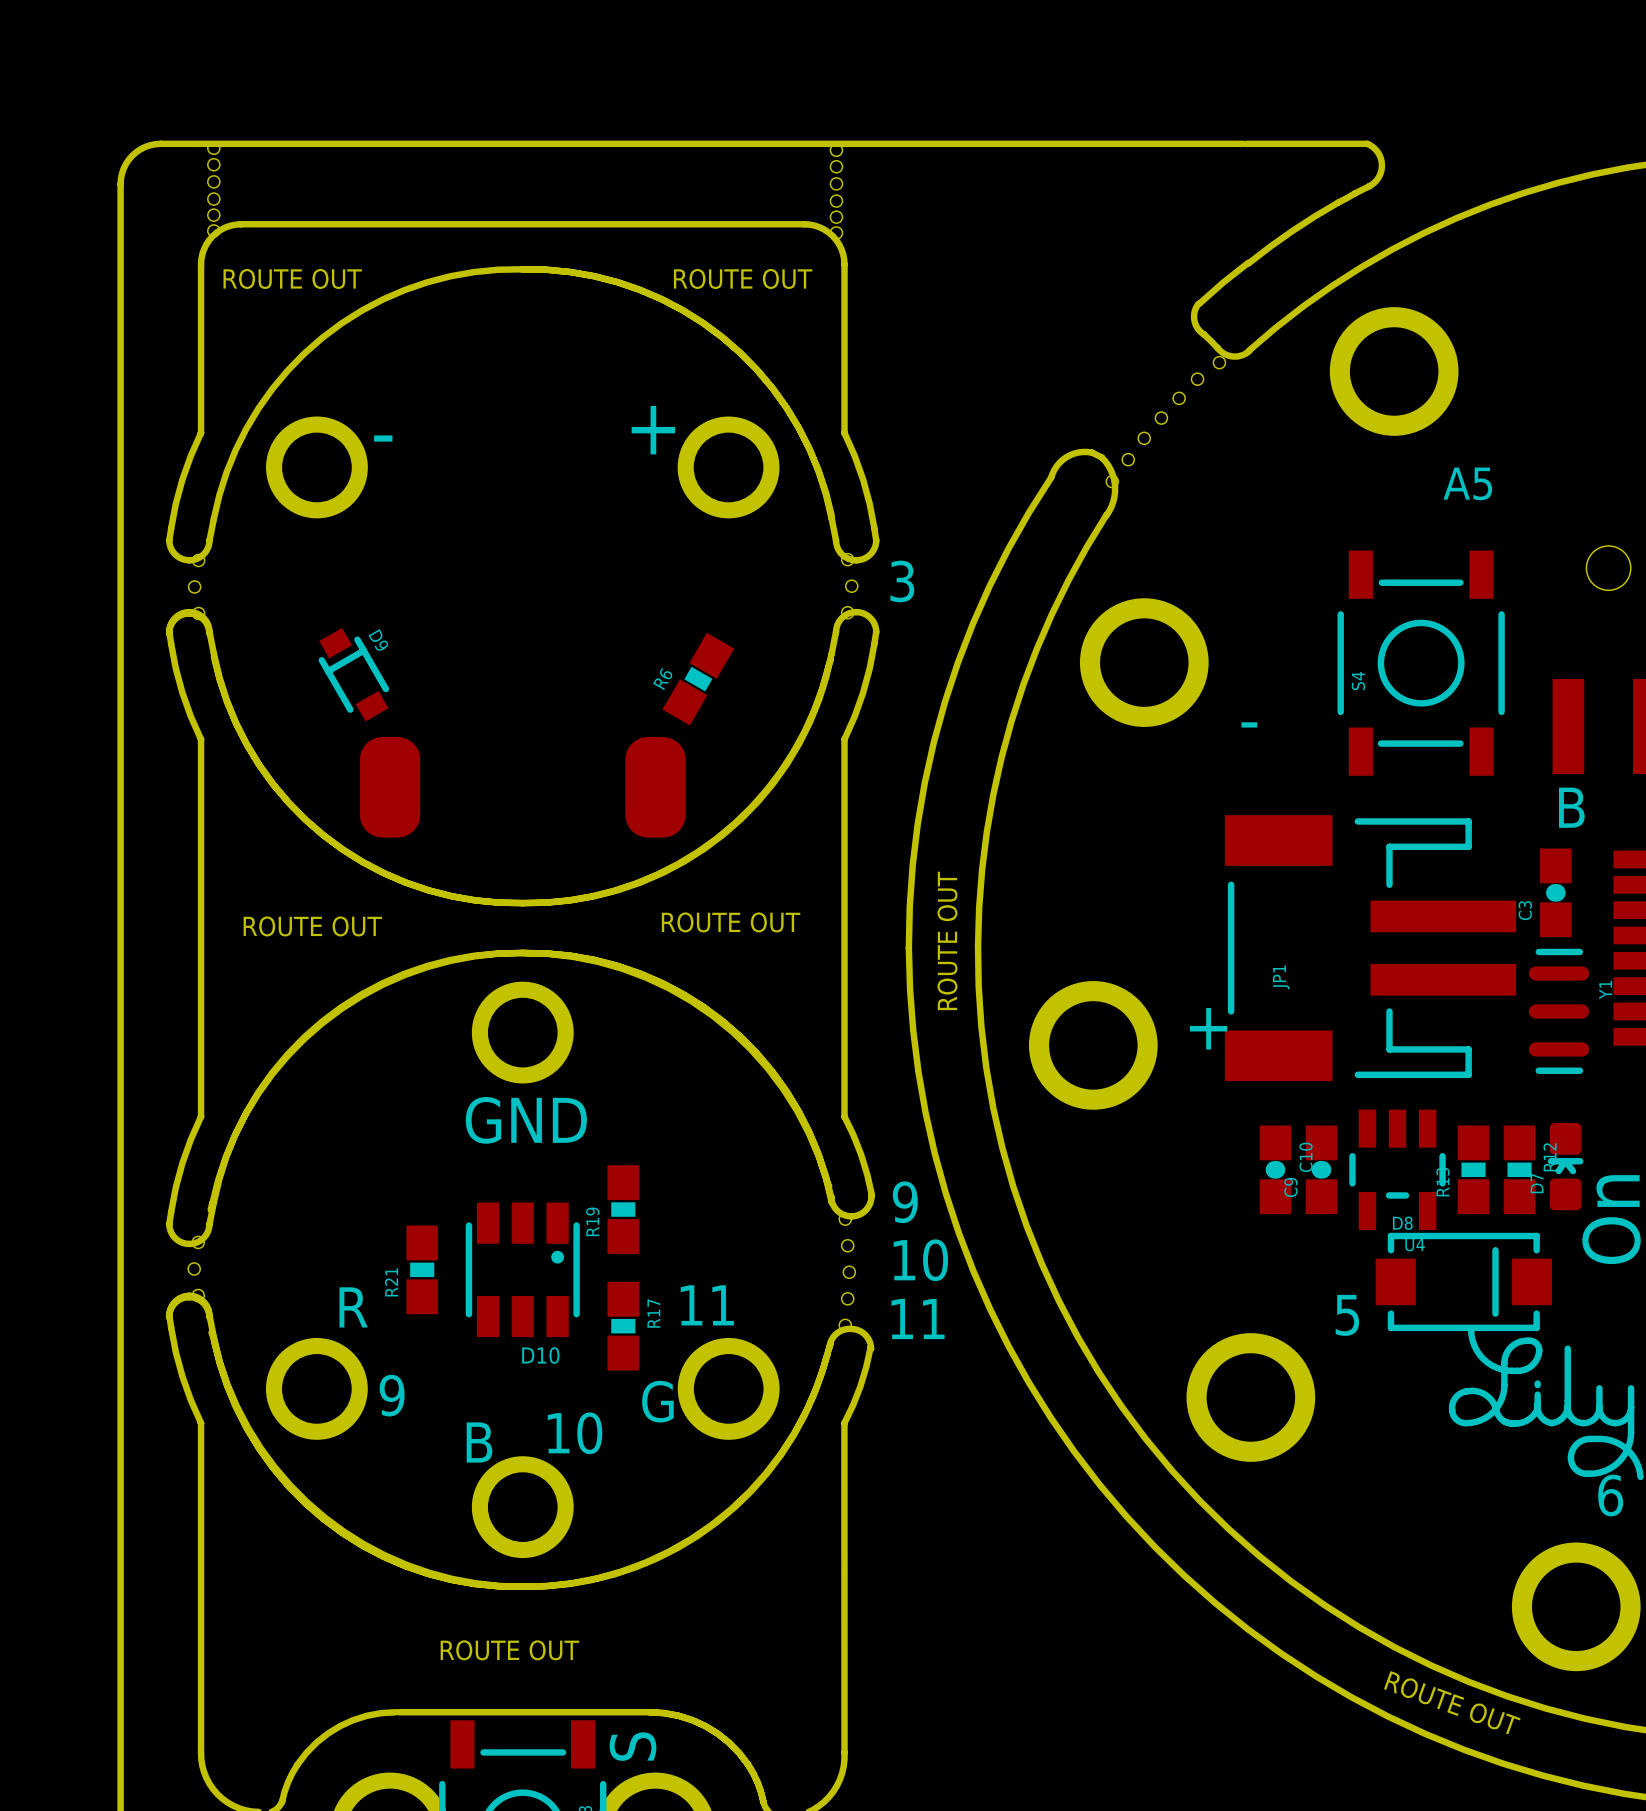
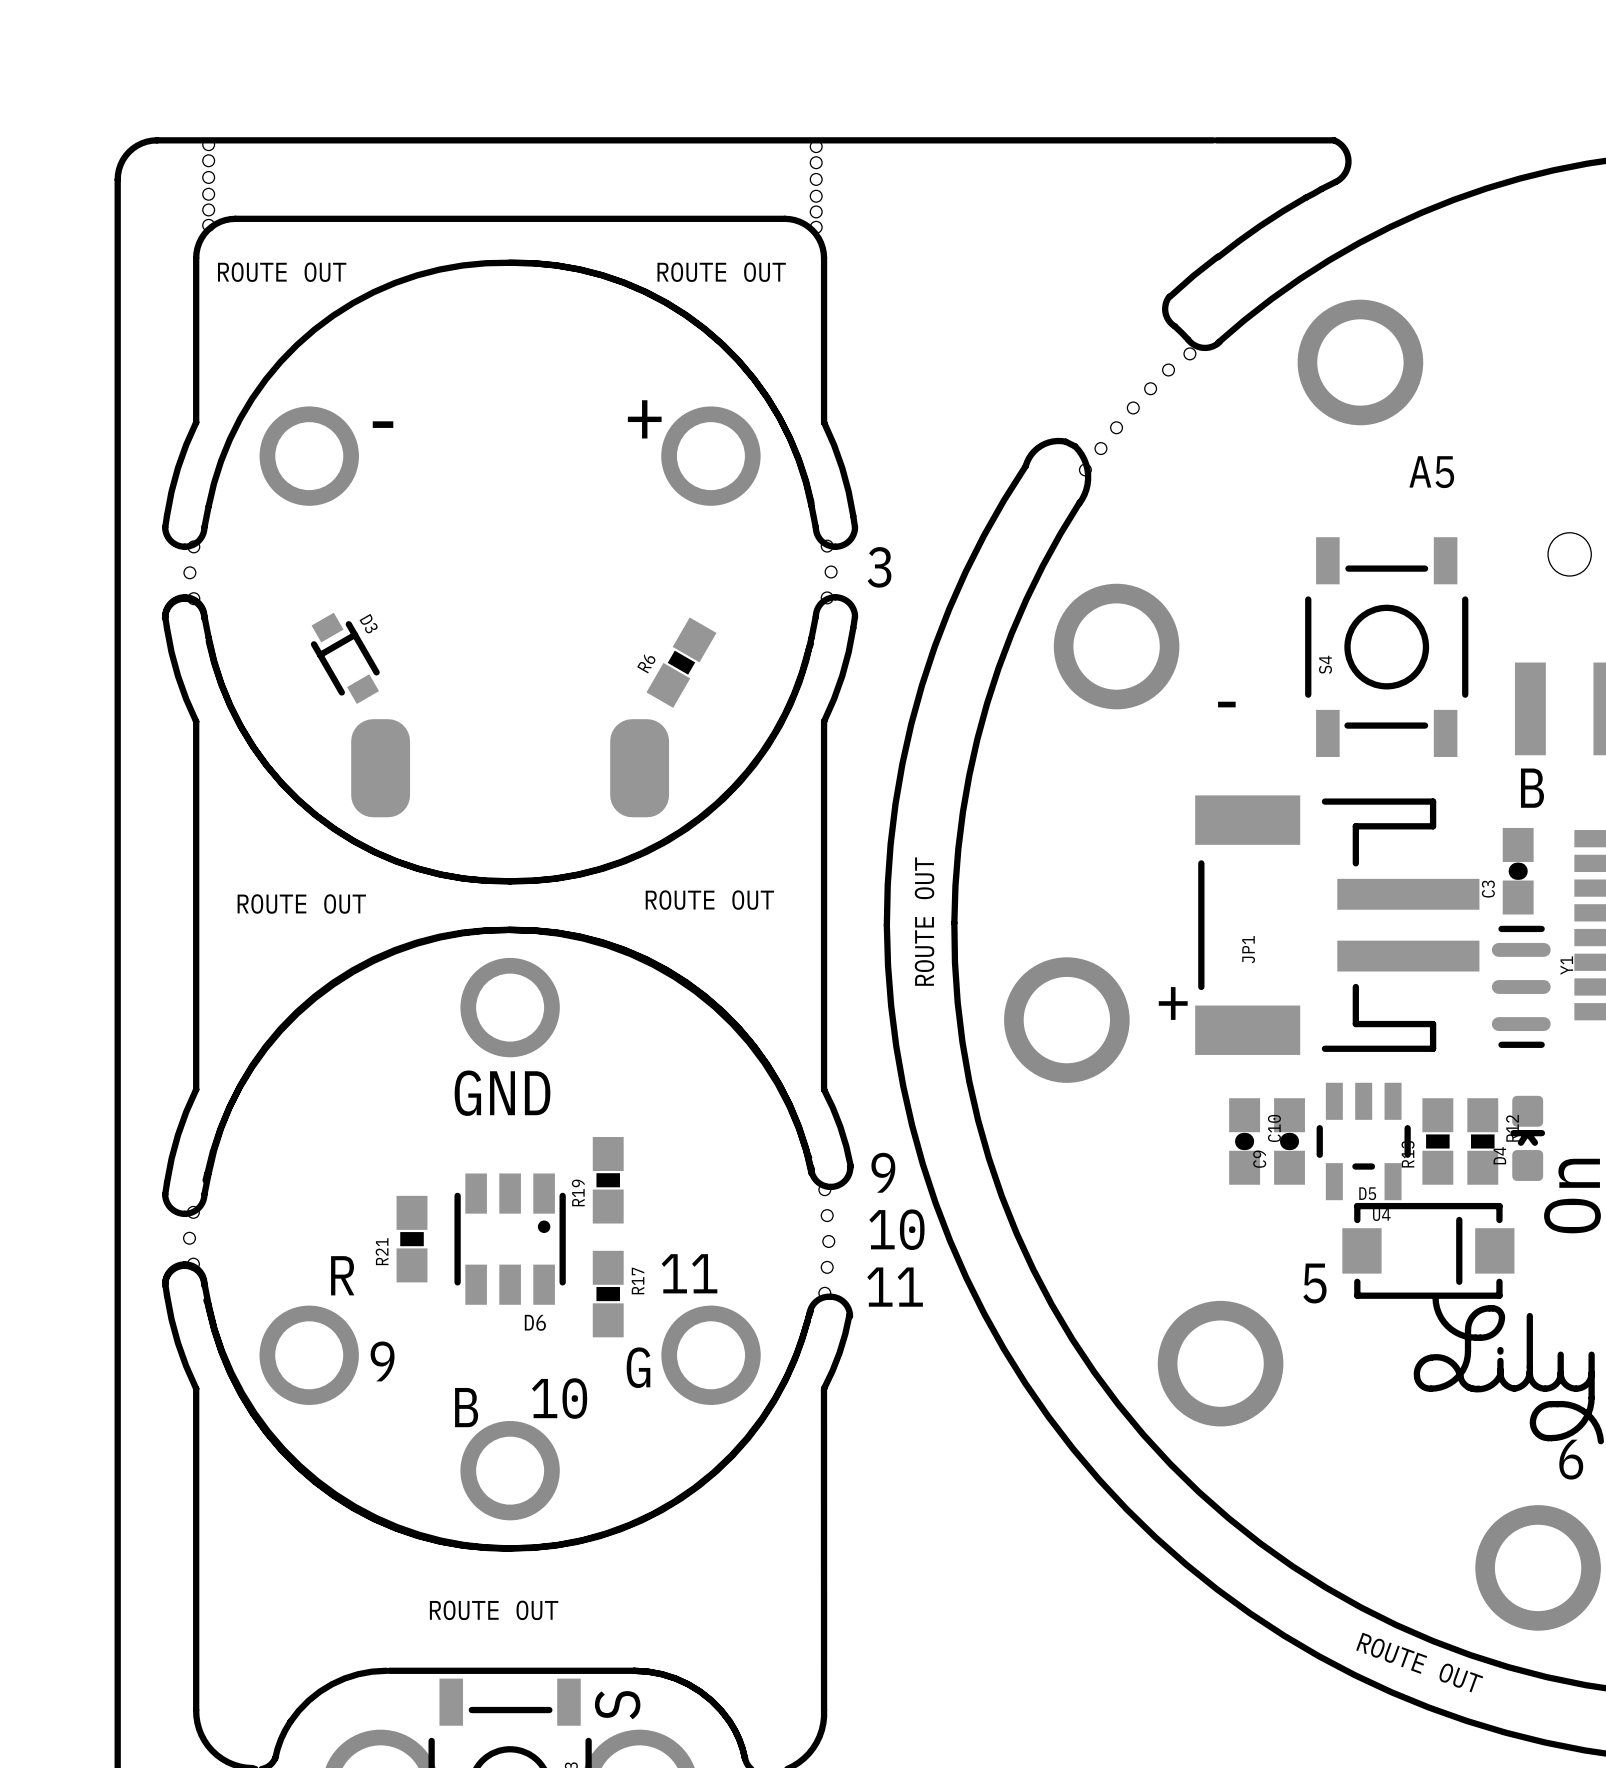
D9 name: D9 (378, 640) -> D3 (368, 623)
D7 name: D7 (1537, 1183) -> D4 (1499, 1155)
D8 name: D8 (1402, 1223) -> D5 (1367, 1193)
D10 name: D10 (540, 1355) -> D6 (535, 1322)

